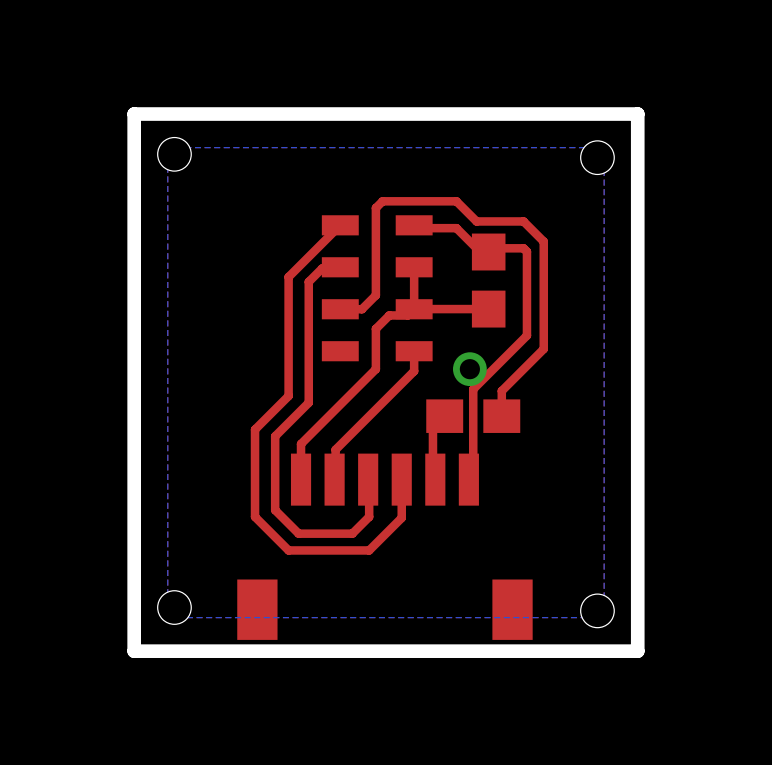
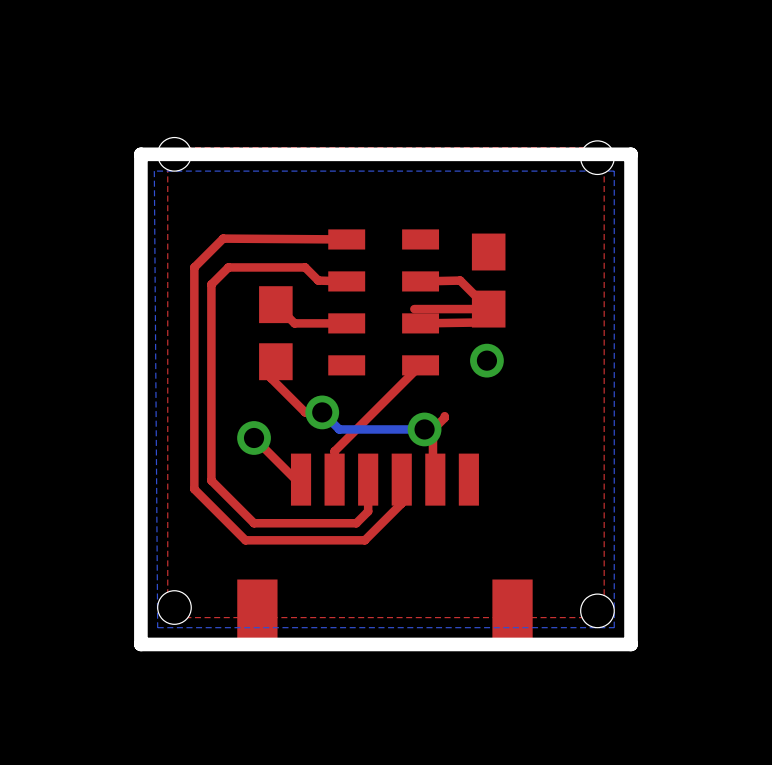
board edge: (637, 114) (637, 651) (134, 651) (134, 114) (637, 114) -> (631, 154) (631, 644) (140, 644) (140, 154) (631, 154)
bottom zone outline: (604, 147) (167, 147) (167, 617) (604, 617) (604, 147) -> (614, 171) (614, 627) (157, 627) (154, 171) (614, 171)
top track: (340, 225) (288, 277) (288, 396) (255, 429) (255, 516) (288, 550) (369, 550) (401, 517) (401, 503) -> (346, 239) (223, 238) (194, 267) (194, 489) (245, 540) (364, 540) (401, 503)
top track: (414, 225) (417, 228) (456, 228) (480, 252) (488, 252) (492, 248) (523, 248) (526, 251) (526, 335) (473, 389) (473, 475) (468, 479) (468, 470) -> none
top track: (340, 267) (322, 268) (308, 281) (308, 402) (275, 436) (275, 510) (298, 533) (352, 533) (369, 516) (368, 479) -> (346, 281) (318, 280) (305, 267) (228, 267) (211, 284) (211, 480) (254, 523) (356, 523) (368, 511) (368, 479)
top track: (414, 267) (414, 309) (407, 315) (389, 315) (375, 328) (375, 369) (301, 444) (301, 479) -> (254, 437) (295, 479) (301, 479)
top track: none -> (420, 281) (460, 280) (488, 309) (475, 322) (420, 323)
part position: (377, 288) -> (383, 302)
top track: none -> (275, 304) (294, 323) (346, 323)
top track: (340, 309) (361, 309) (375, 295) (375, 208) (382, 201) (456, 201) (476, 221) (523, 221) (543, 241) (543, 349) (501, 390) (501, 416) -> none
top track: (414, 351) (414, 371) (335, 449) (334, 479) -> none
top track: none -> (275, 361) (271, 366) (271, 378) (305, 412) (322, 412)
top track: none -> (420, 365) (334, 451) (334, 493) (330, 497)
via position: (469, 369) -> (486, 360)
bottom track: none -> (322, 412) (339, 429) (424, 429)
via: none -> (322, 412)
part rotation: 0° (473, 416) -> 90° clockwise (275, 333)
part position: (473, 416) -> (275, 333)
via: none -> (424, 429)
via: none -> (254, 437)

